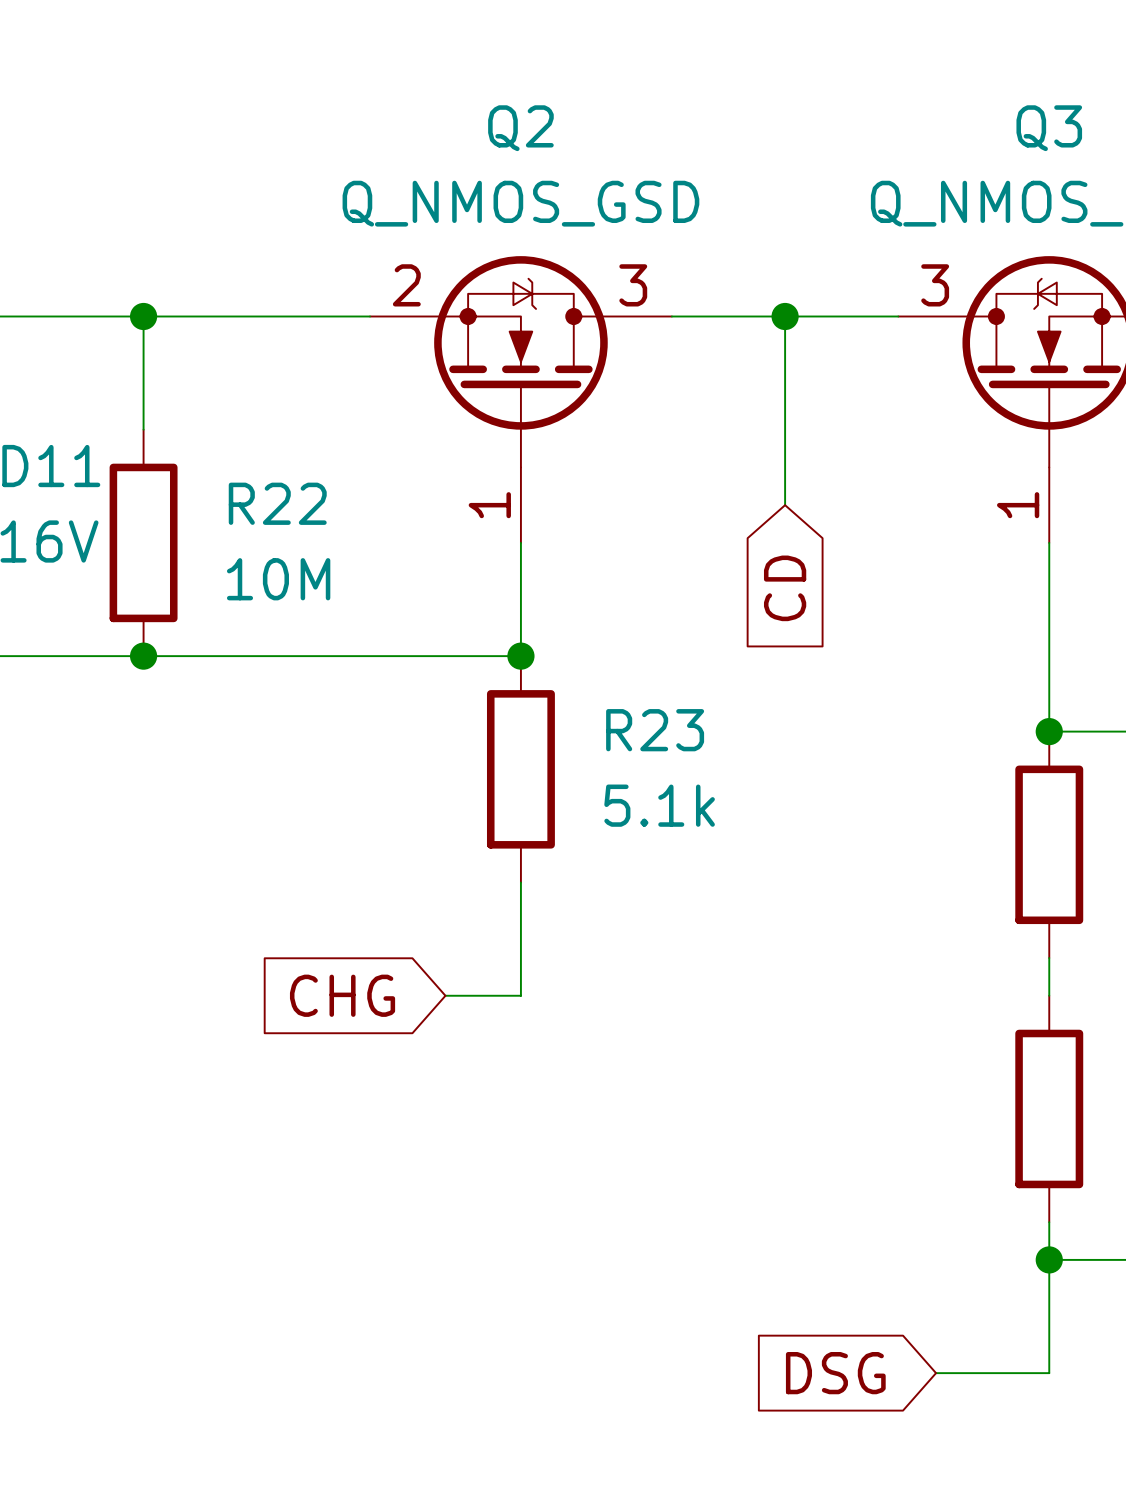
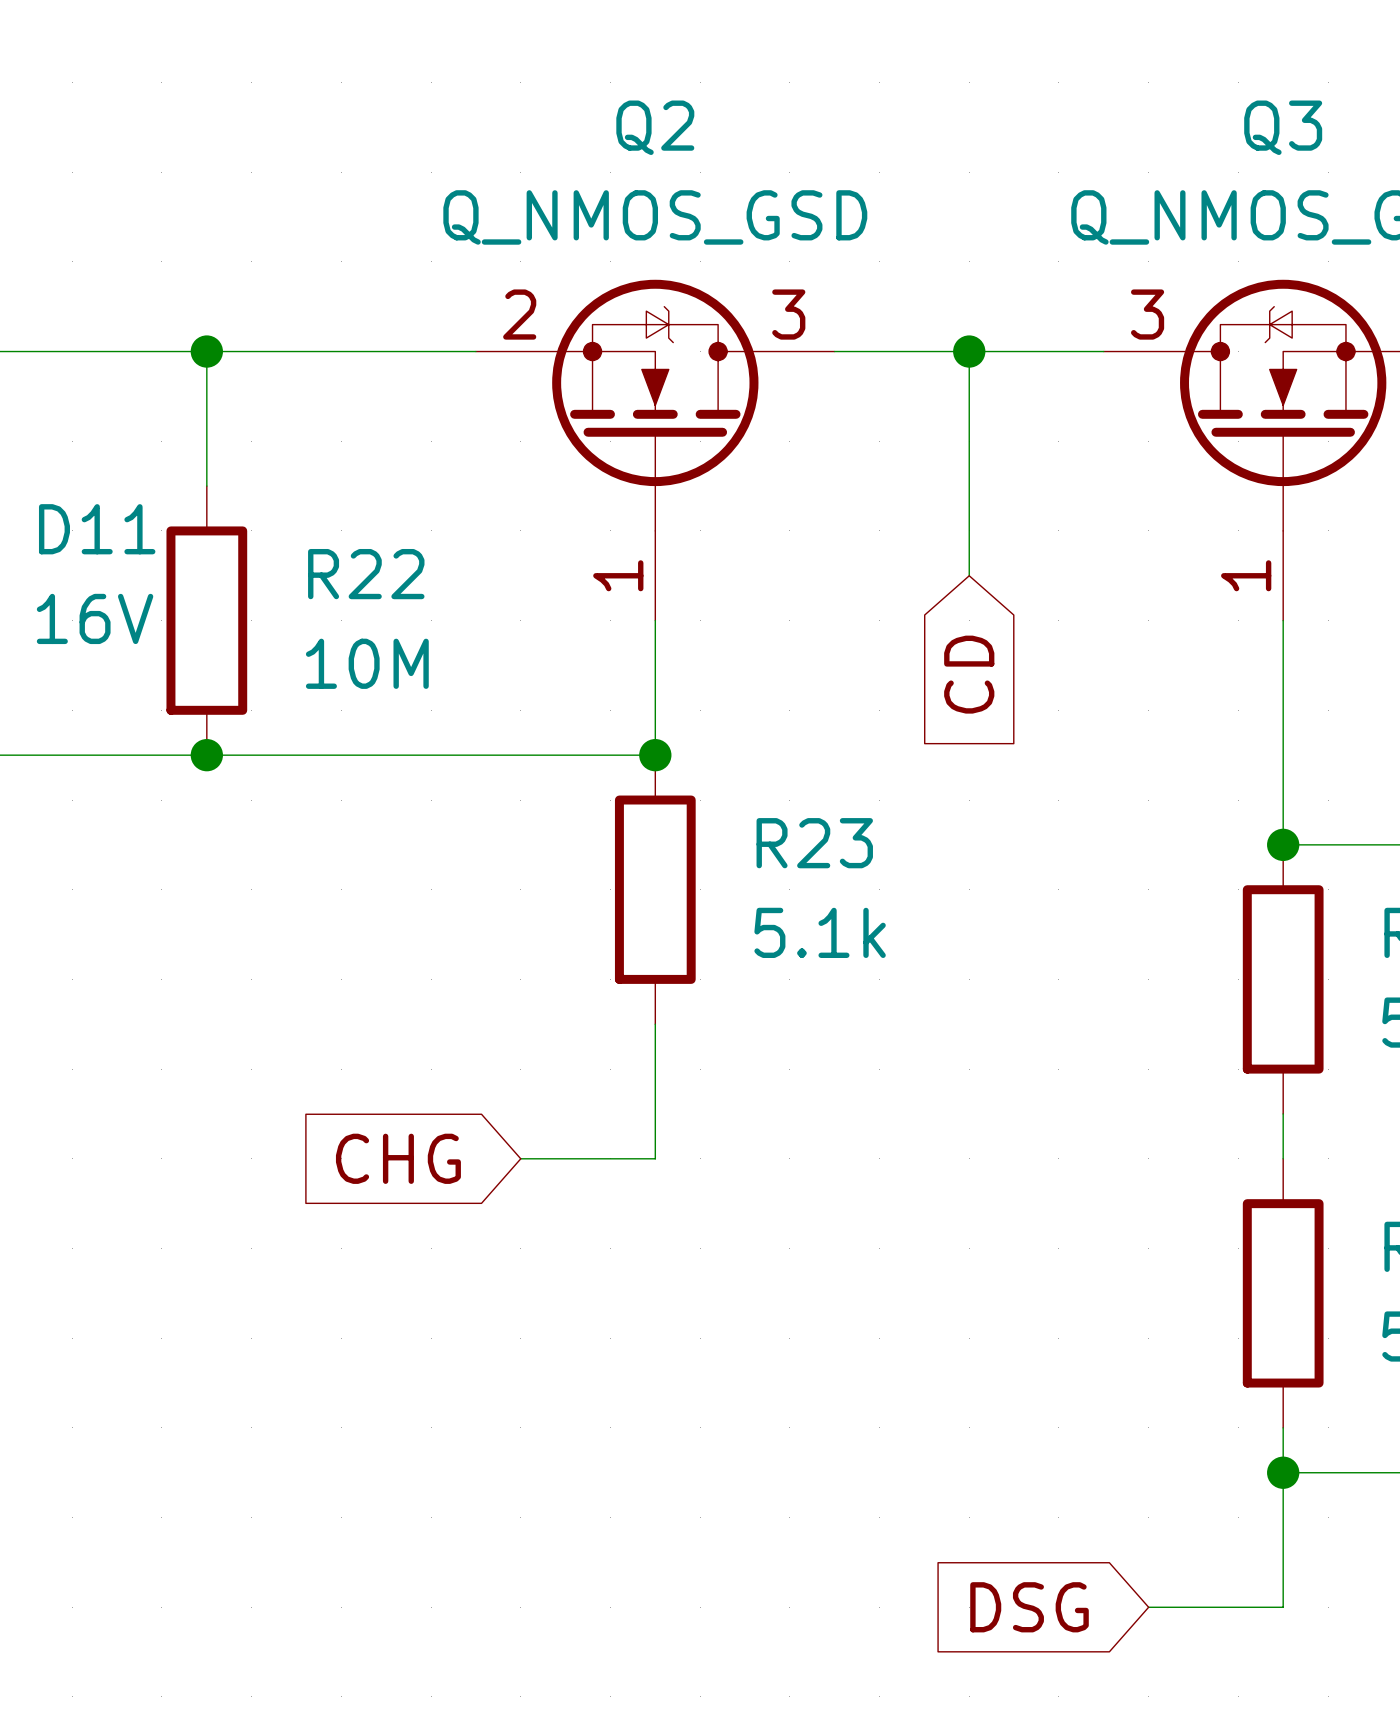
global label position: CHG (342, 995) -> CHG (398, 1158)
wire: none -> (520, 1158) (565, 1158)

